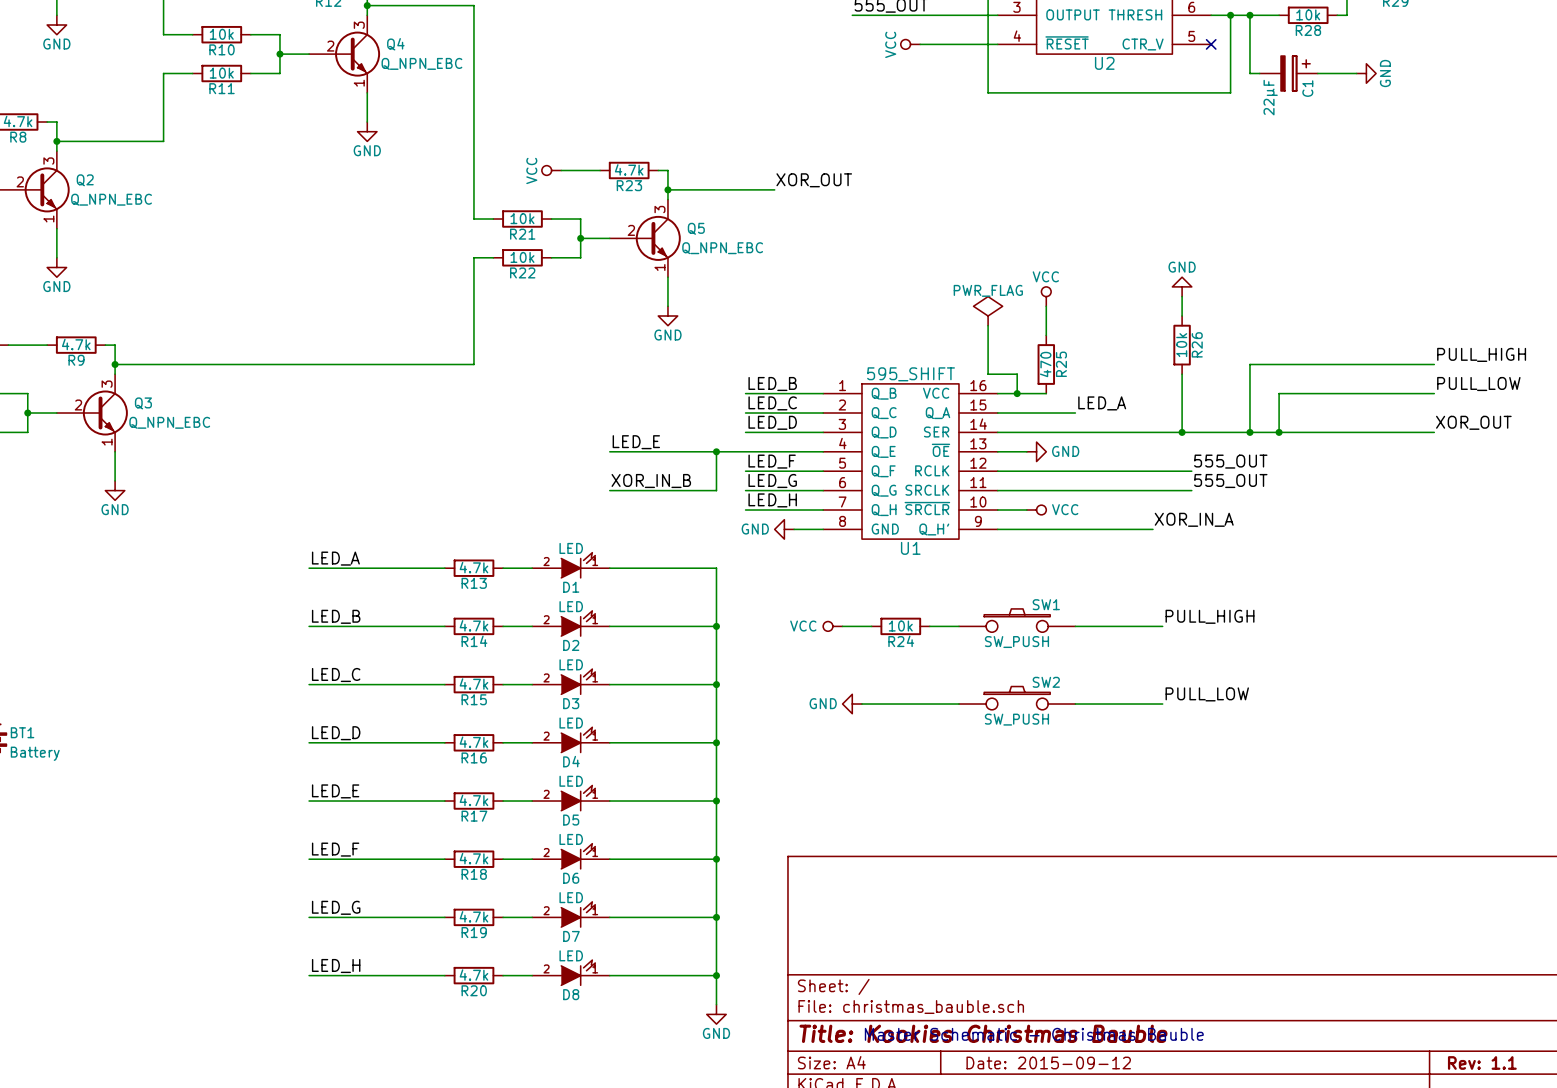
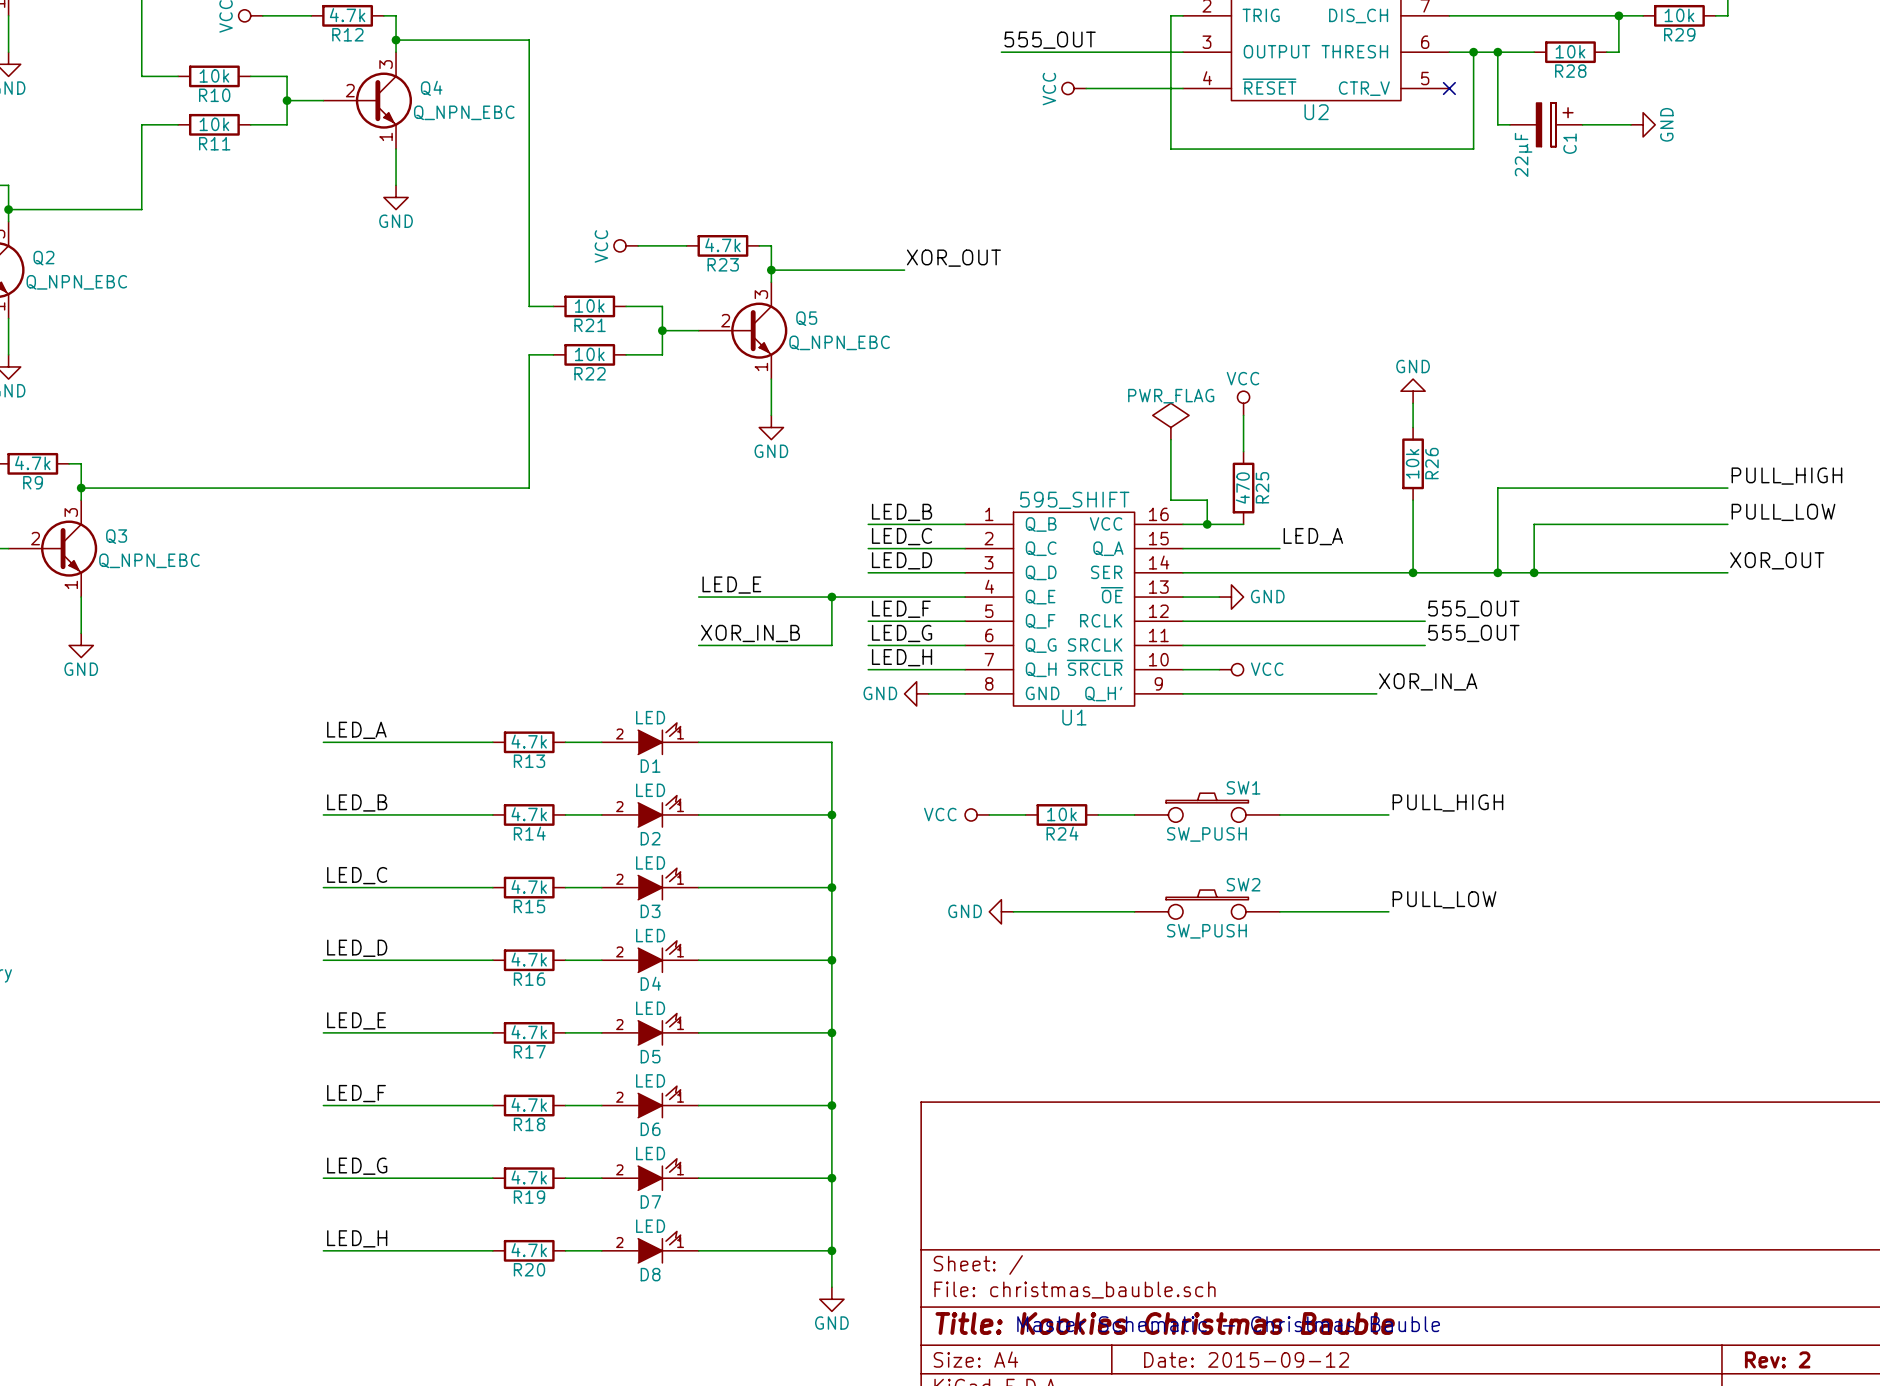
title block: Rev: 1.1 (1482, 1062) -> Rev: 2 (1777, 1359)

